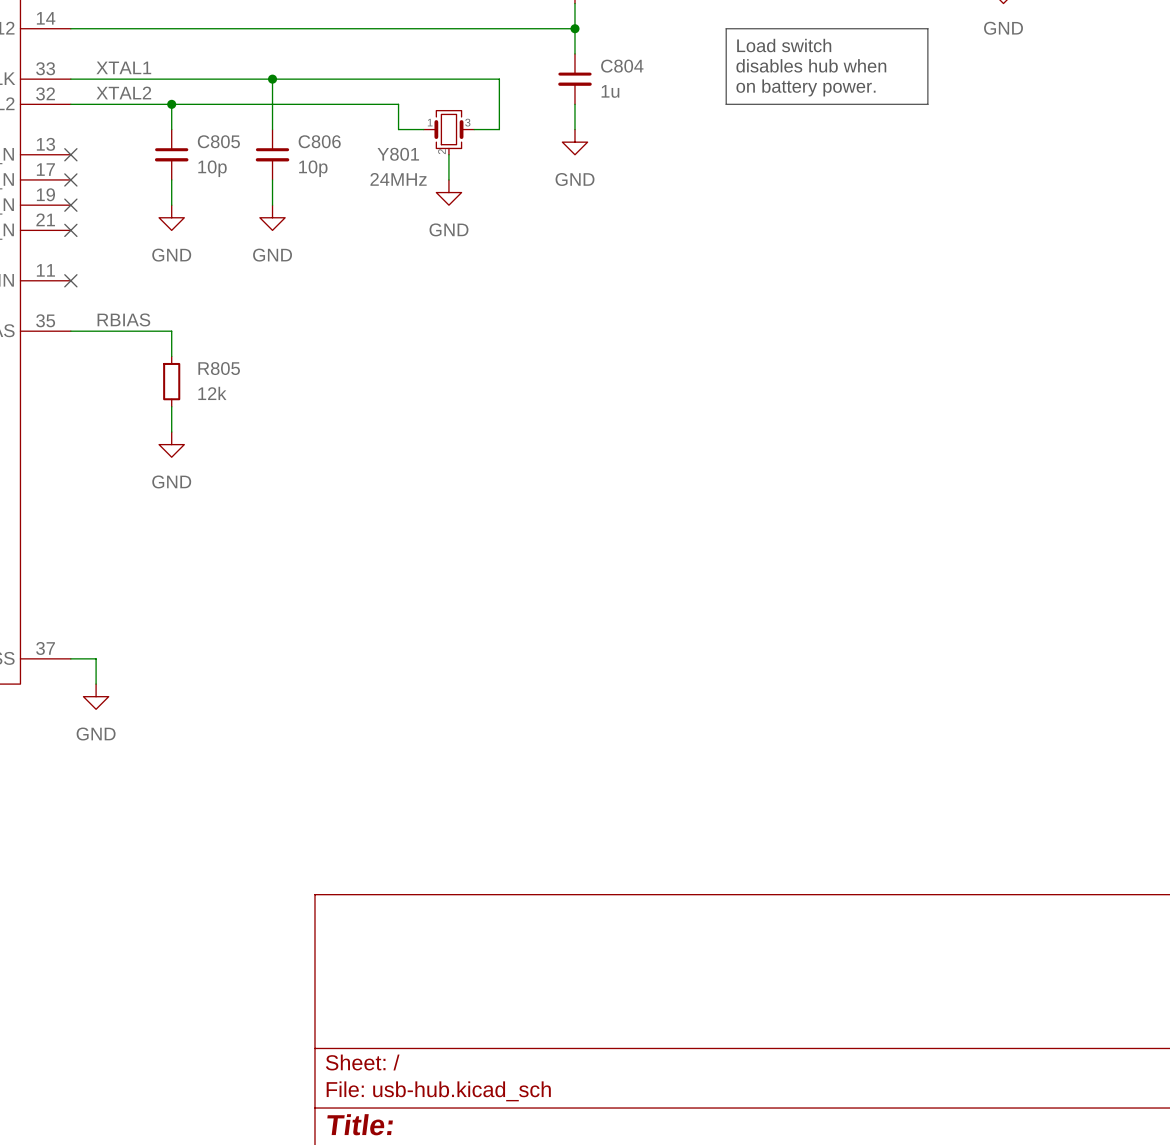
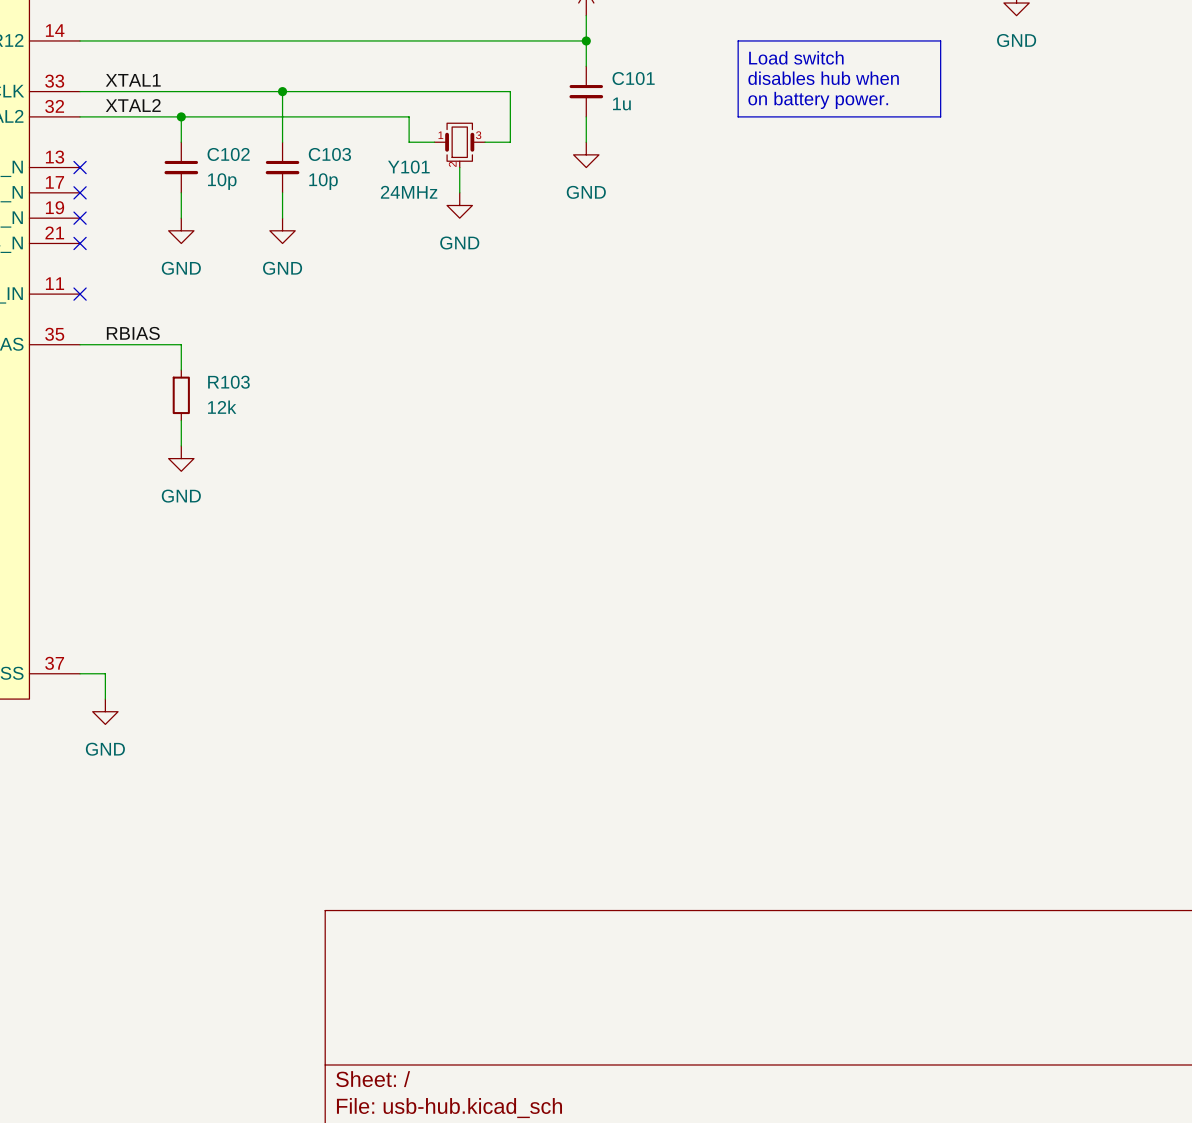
C804 name: C804 (622, 66) -> C101 (633, 78)
C805 name: C805 (218, 141) -> C102 (228, 154)
C806 name: C806 (319, 141) -> C103 (329, 154)
Y801 name: Y801 (398, 154) -> Y101 (408, 167)
R805 name: R805 (219, 368) -> R103 (228, 382)

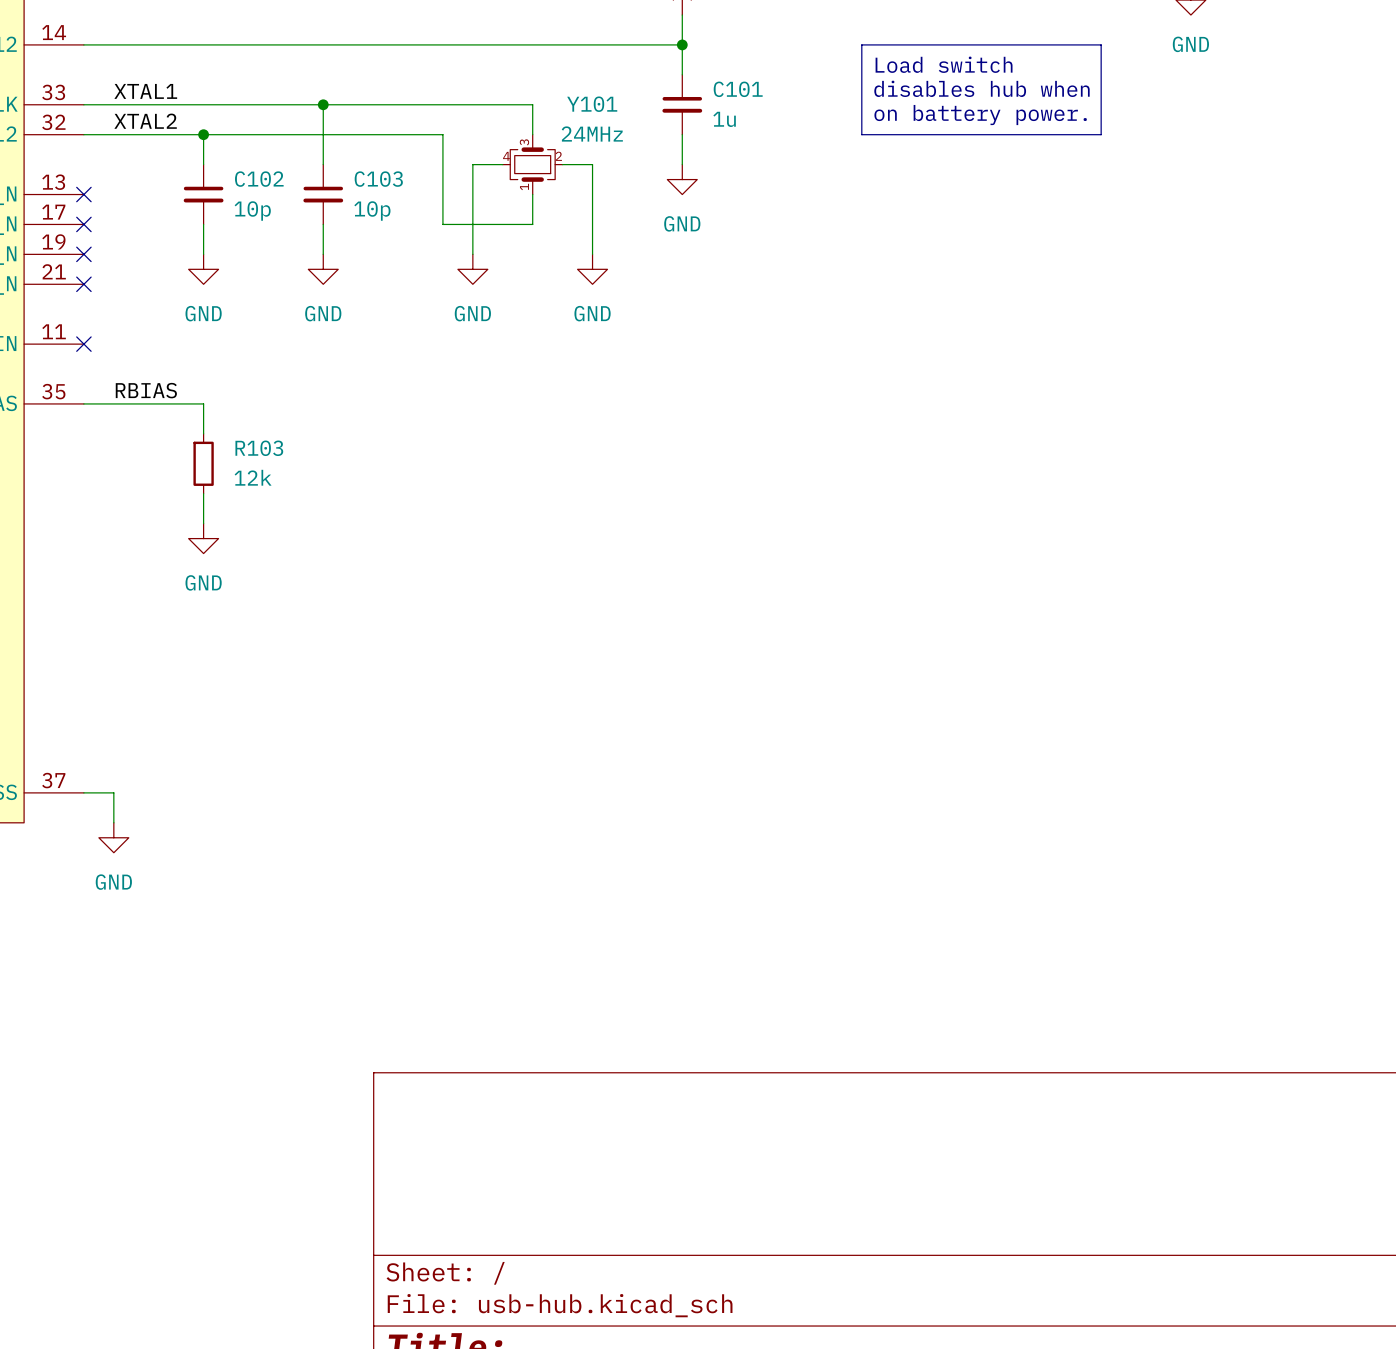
wire: (459, 91) (510, 91) (510, 142) -> (532, 104) (532, 134)
wire: (383, 116) (409, 116) (409, 142) -> (442, 134) (442, 224) (532, 224)
Y101 symbol: [434, 123, 486, 168] -> [502, 134, 563, 195]
wire: none -> (472, 164) (472, 254)
wire: none -> (592, 164) (592, 254)
Y101 name position: Y101 (408, 167) -> Y101 (592, 104)
Y101 text position: 24MHz (409, 192) -> 24MHz (592, 134)
power symbol: GND (459, 205) -> none
power symbol: none -> GND (472, 269)
power symbol: none -> GND (592, 269)

